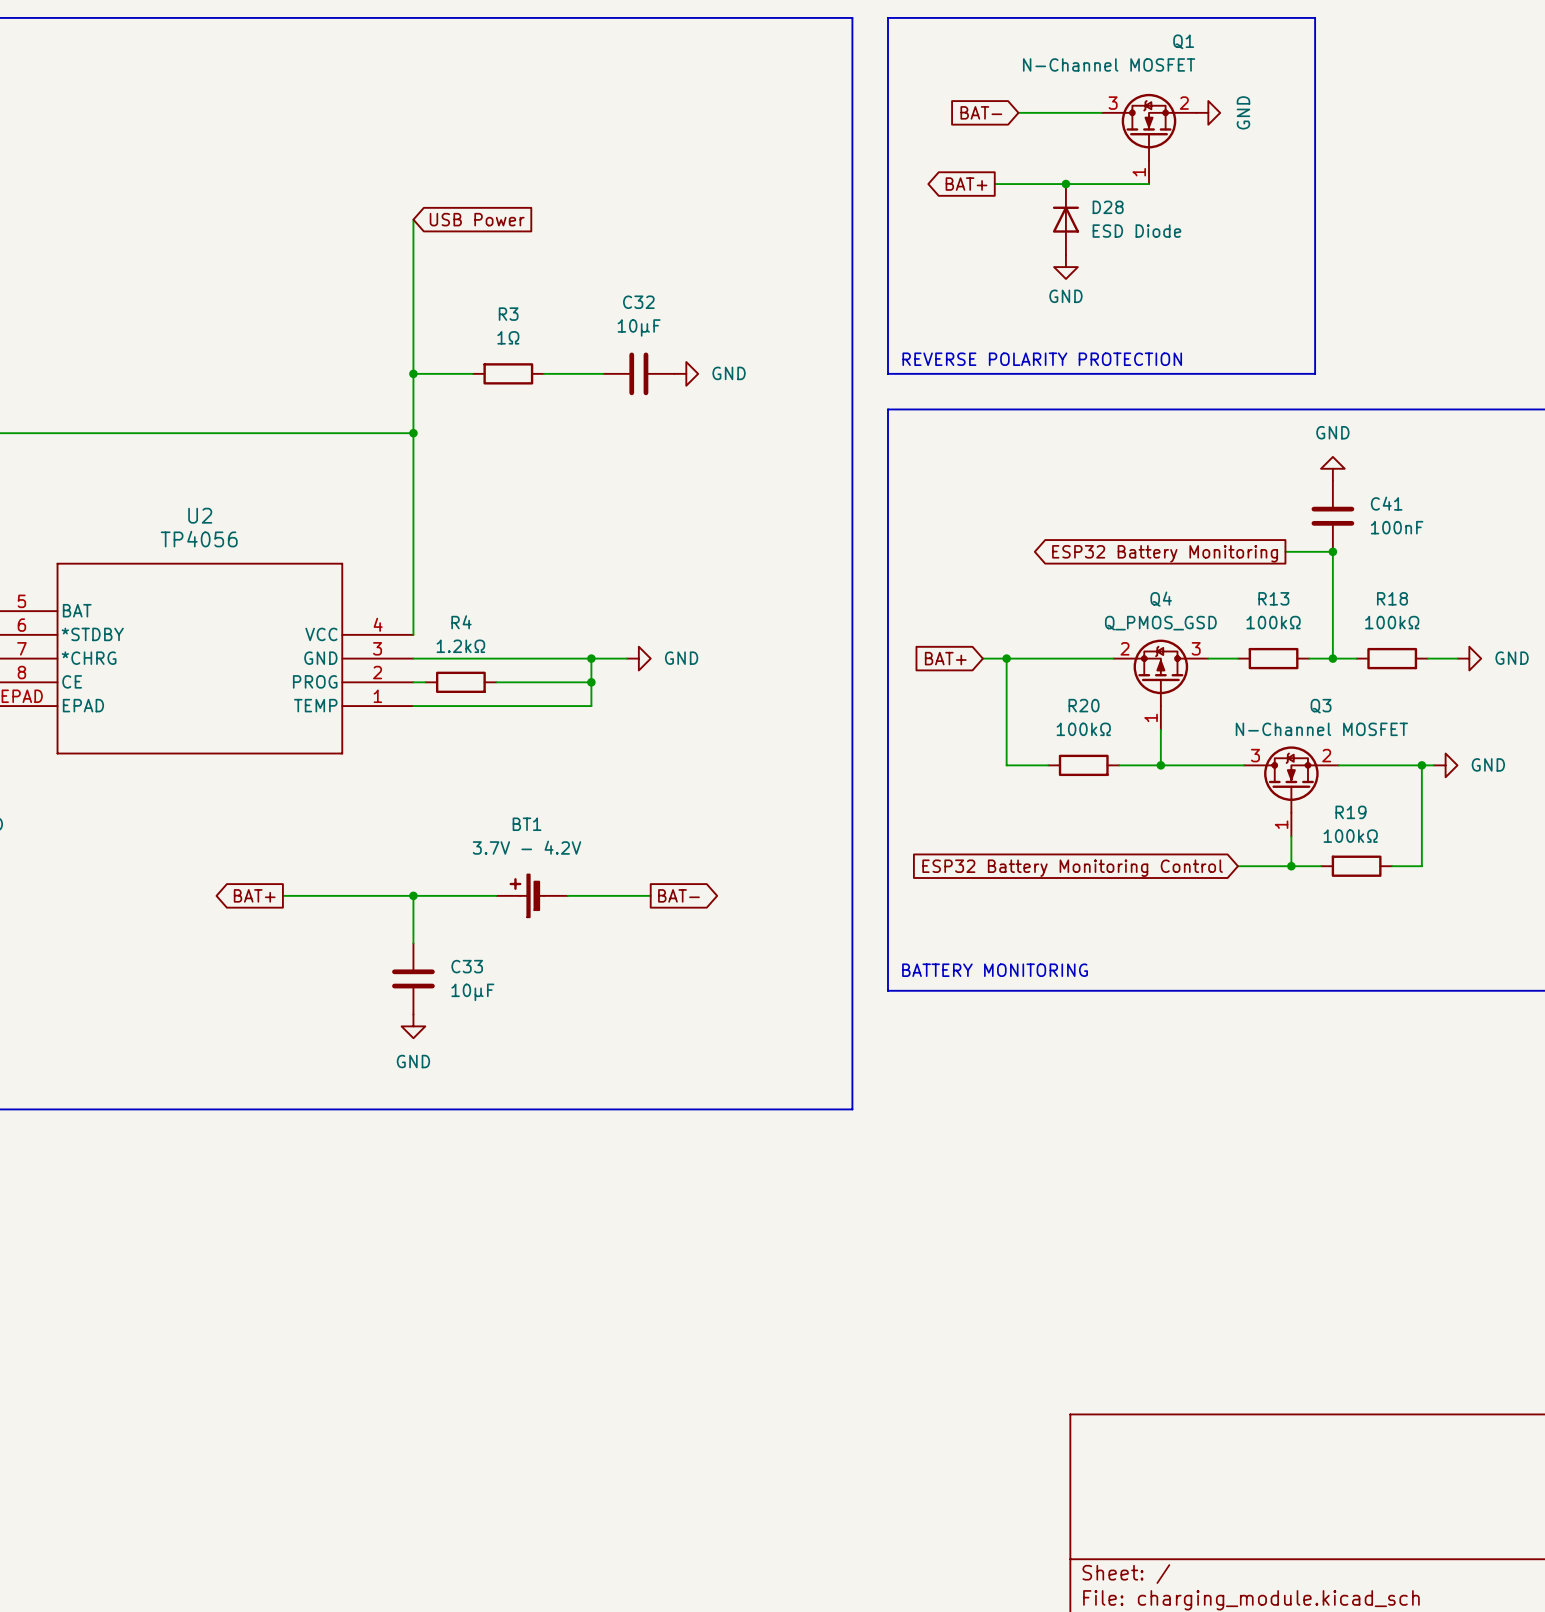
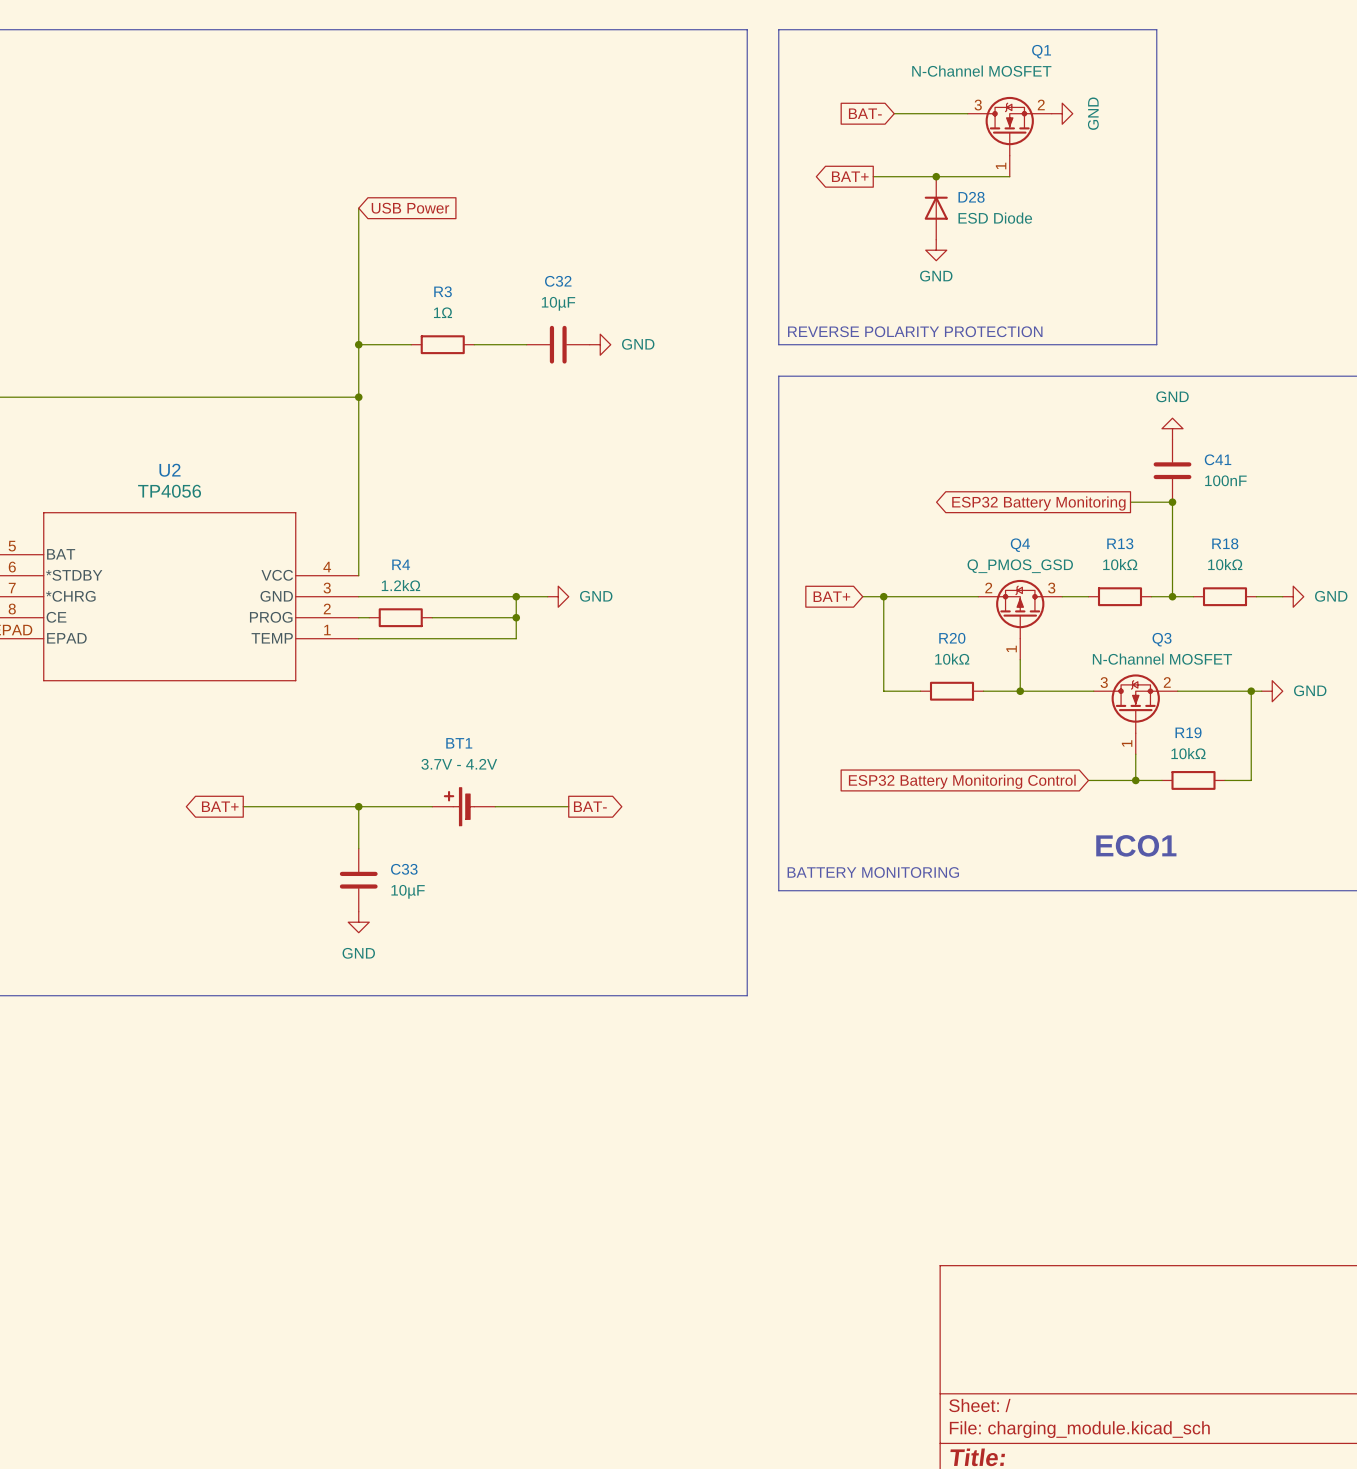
R13 value: 100kΩ (1273, 622) -> 10kΩ (1120, 564)
R18 value: 100kΩ (1392, 622) -> 10kΩ (1225, 564)
R20 value: 100kΩ (1083, 729) -> 10kΩ (952, 659)
R19 value: 100kΩ (1350, 836) -> 10kΩ (1188, 753)
text: none -> ECO1 (1136, 845)

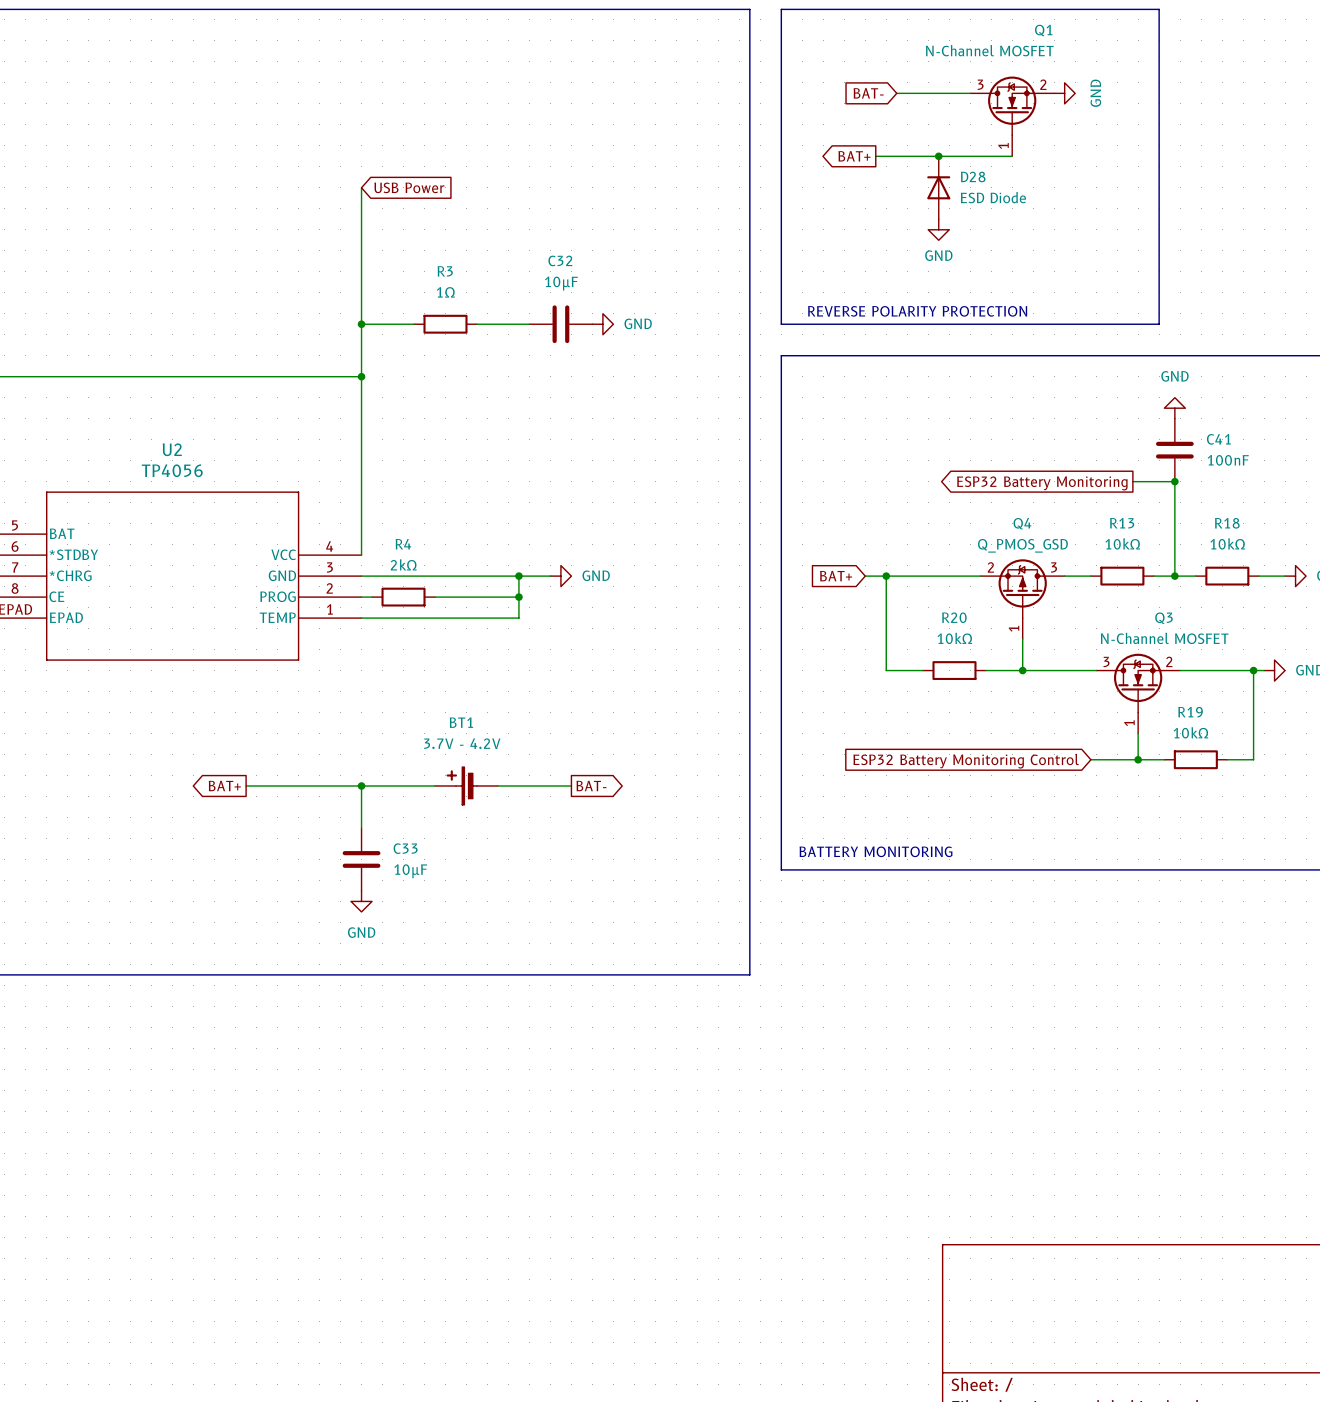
R4 value: 1.2kΩ (401, 585) -> 2kΩ (403, 564)
text: ECO1 (1136, 845) -> none

